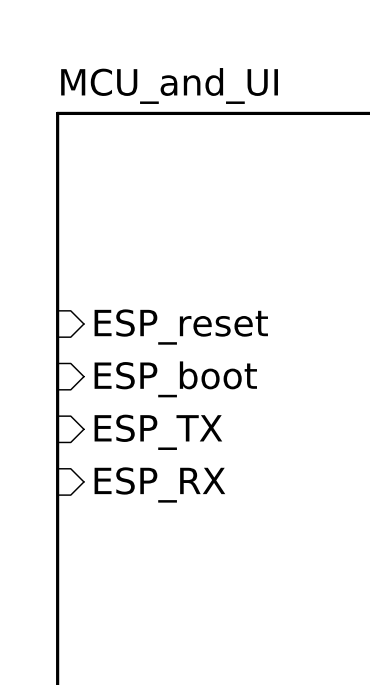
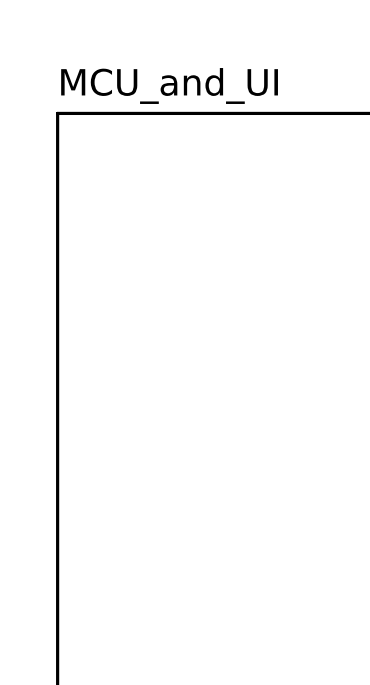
sheet pin: ESP_reset (181, 327) -> none
sheet pin: ESP_boot (175, 379) -> none
sheet pin: ESP_TX (158, 432) -> none
sheet pin: ESP_RX (159, 484) -> none

